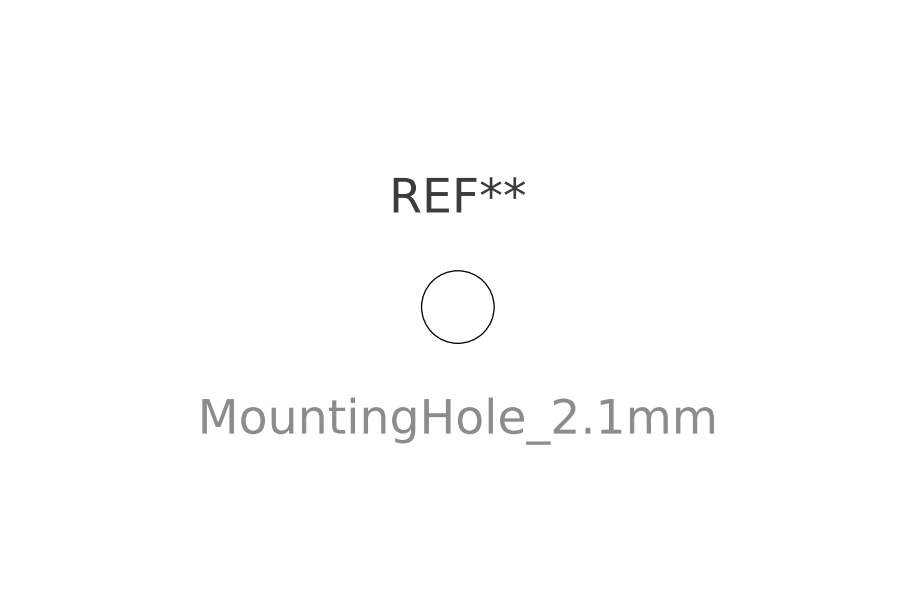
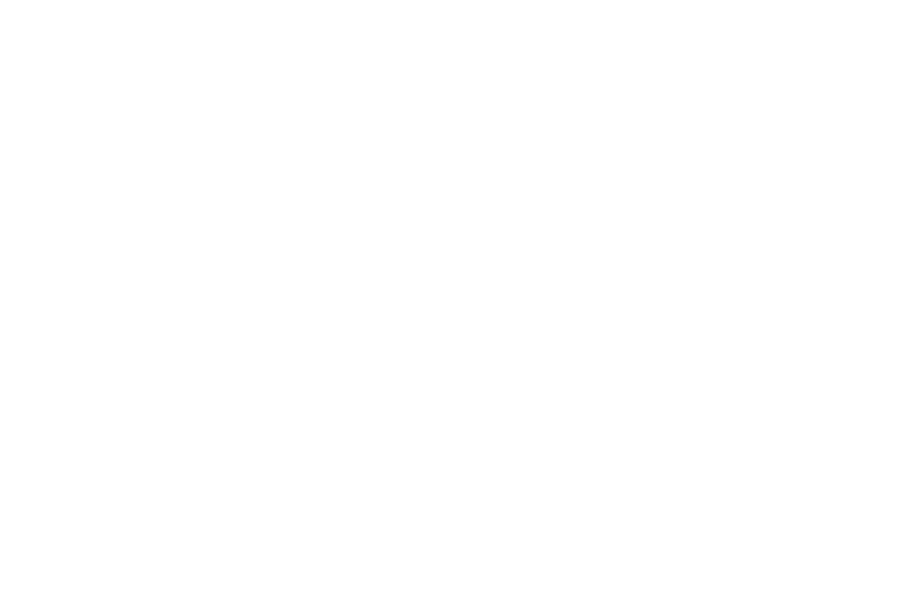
REF**: MountingHole_2.1mm (457, 307) -> none

